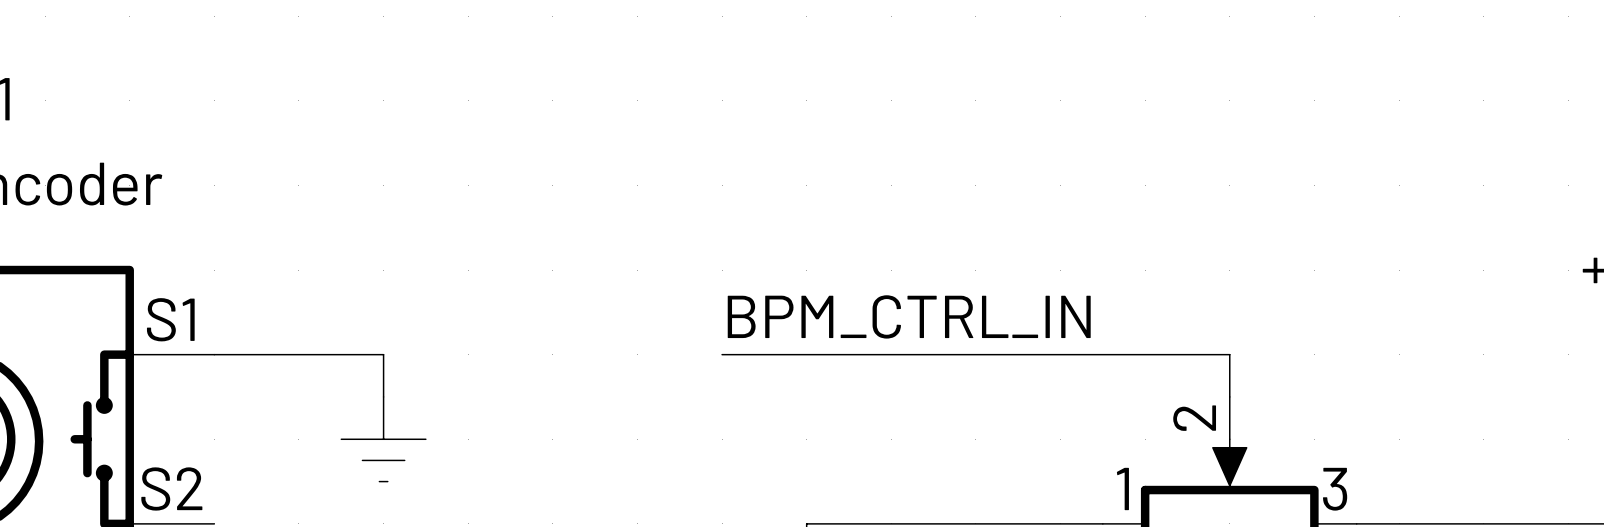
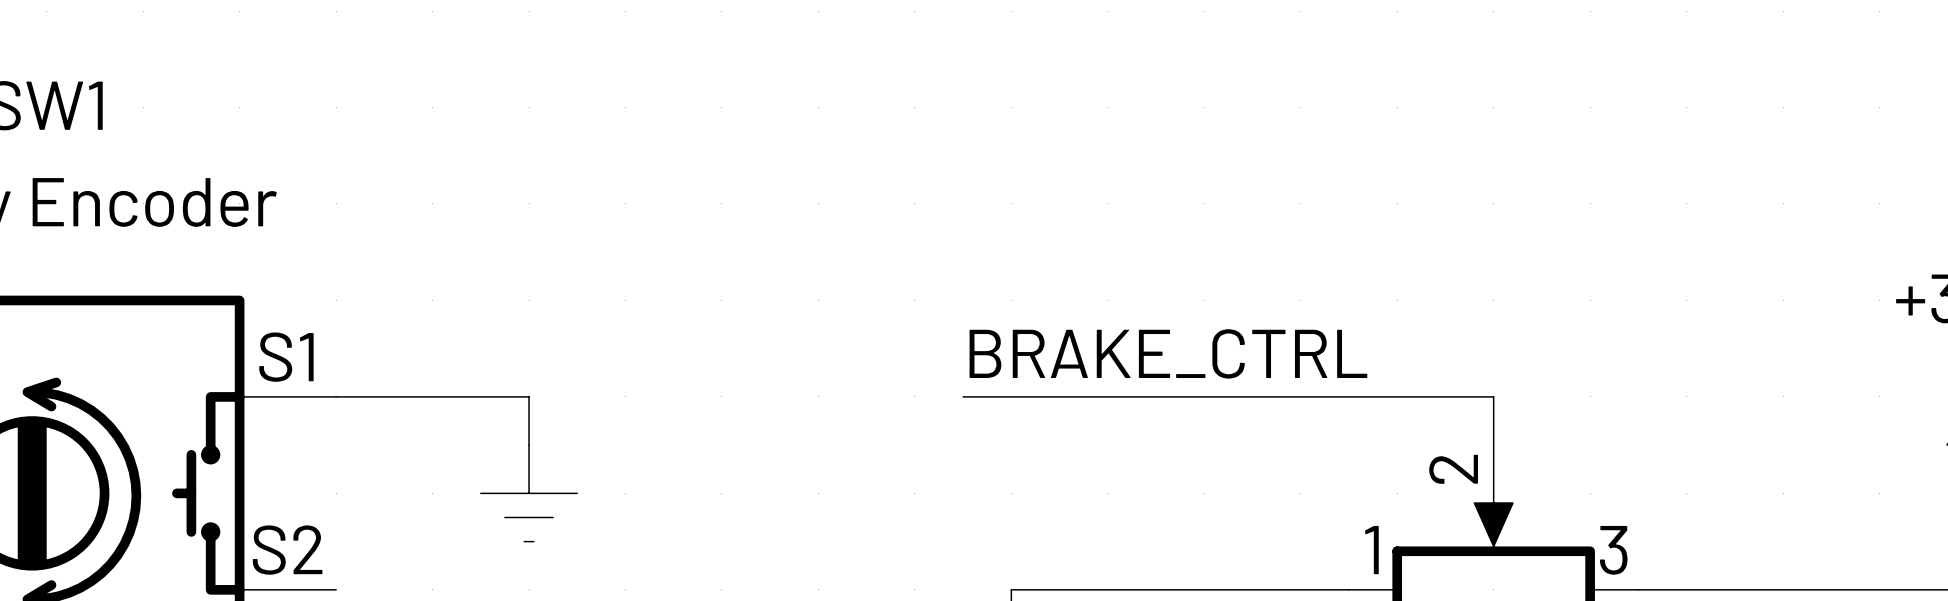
label: BPM_CTRL_IN (909, 316) -> none
label: none -> BRAKE_CTRL (1168, 353)
wire: (722, 354) (764, 354) -> none

